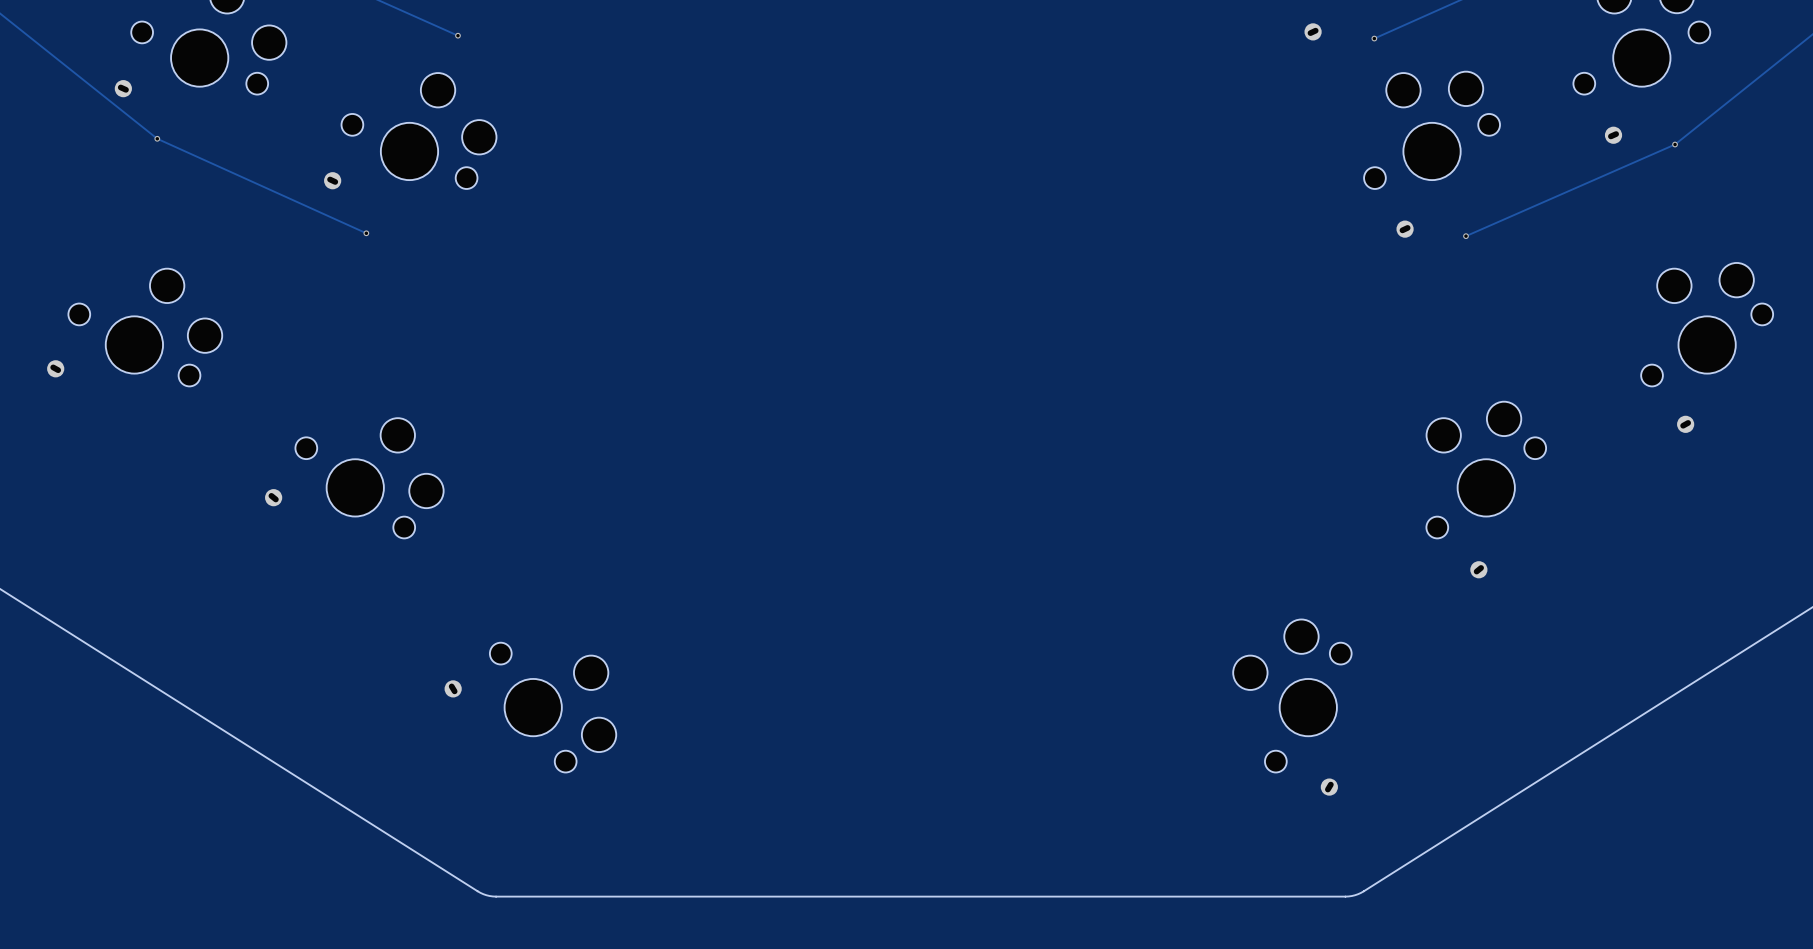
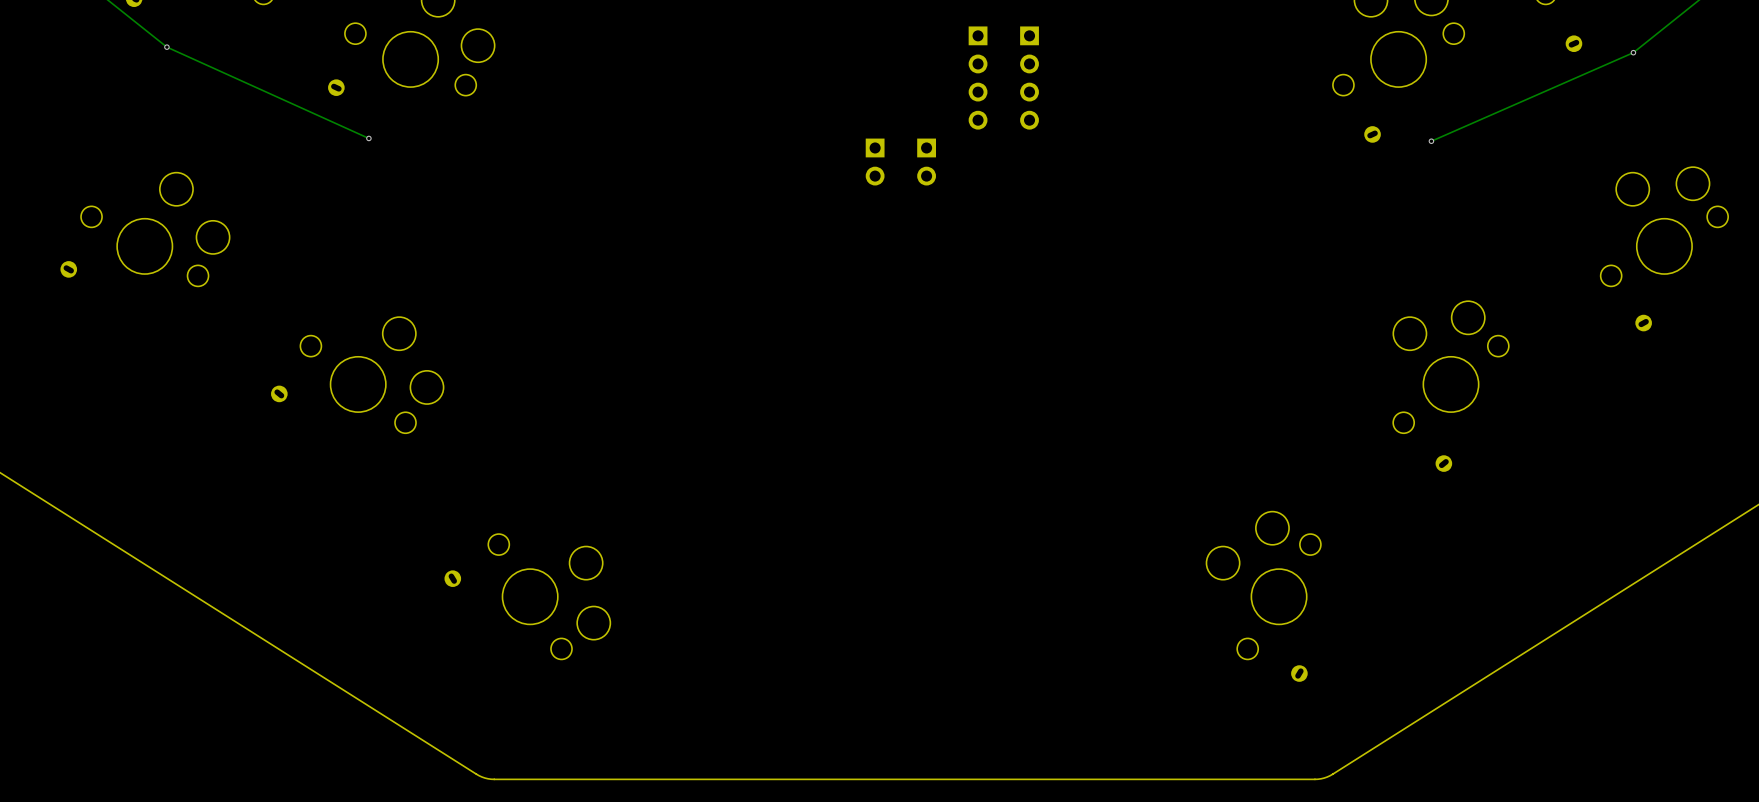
part: none -> (978, 78)
part: none -> (1029, 78)
part: none -> (875, 162)
part: none -> (926, 162)

